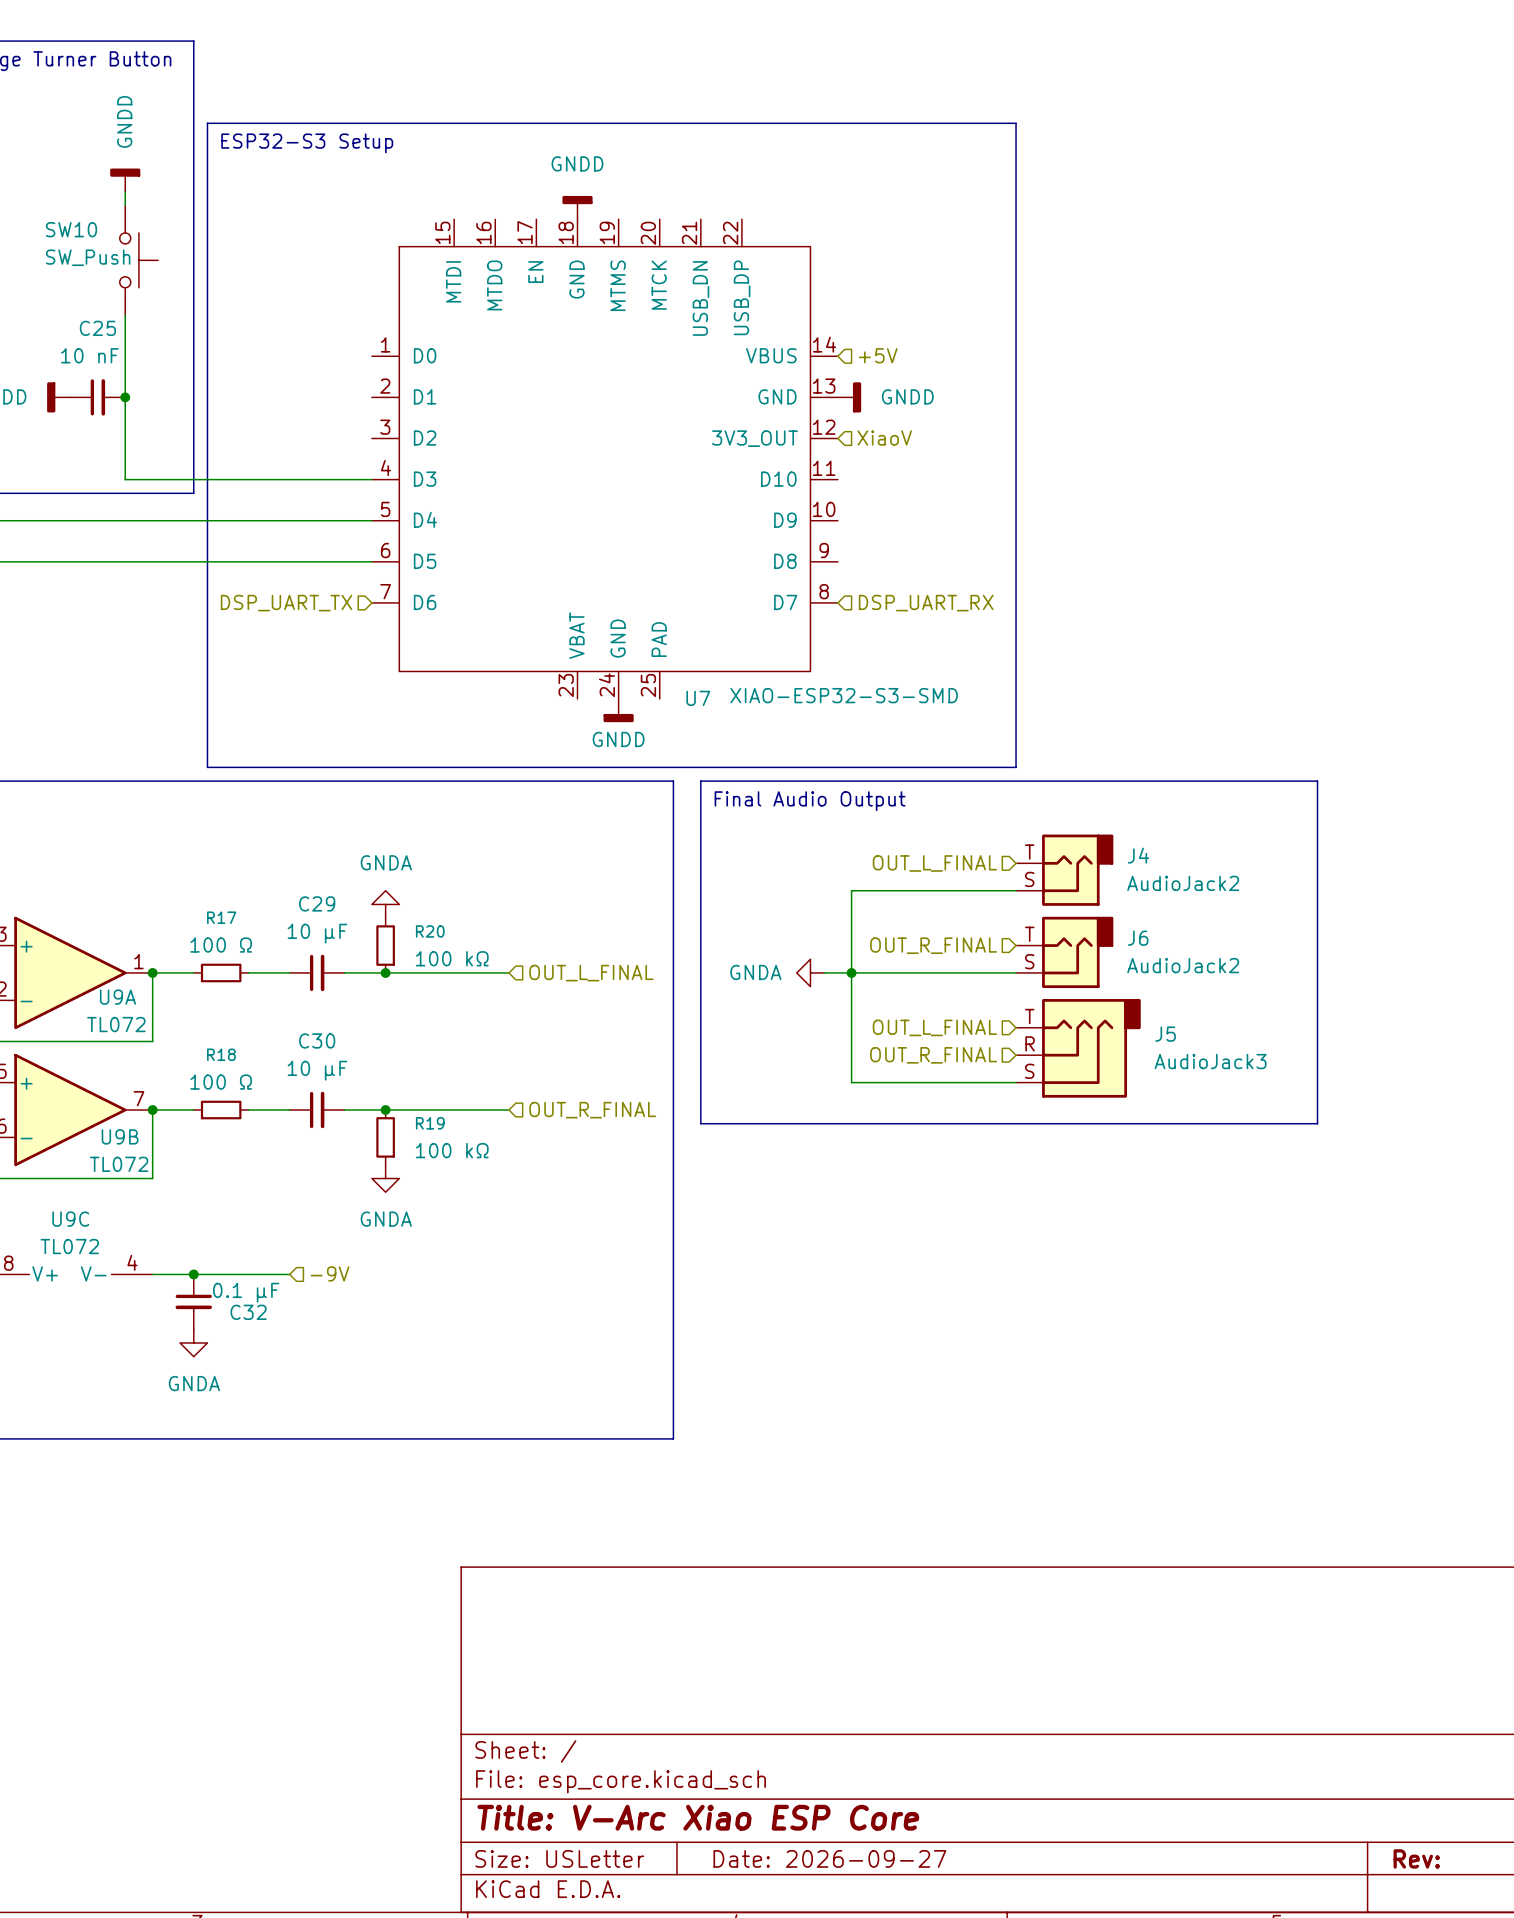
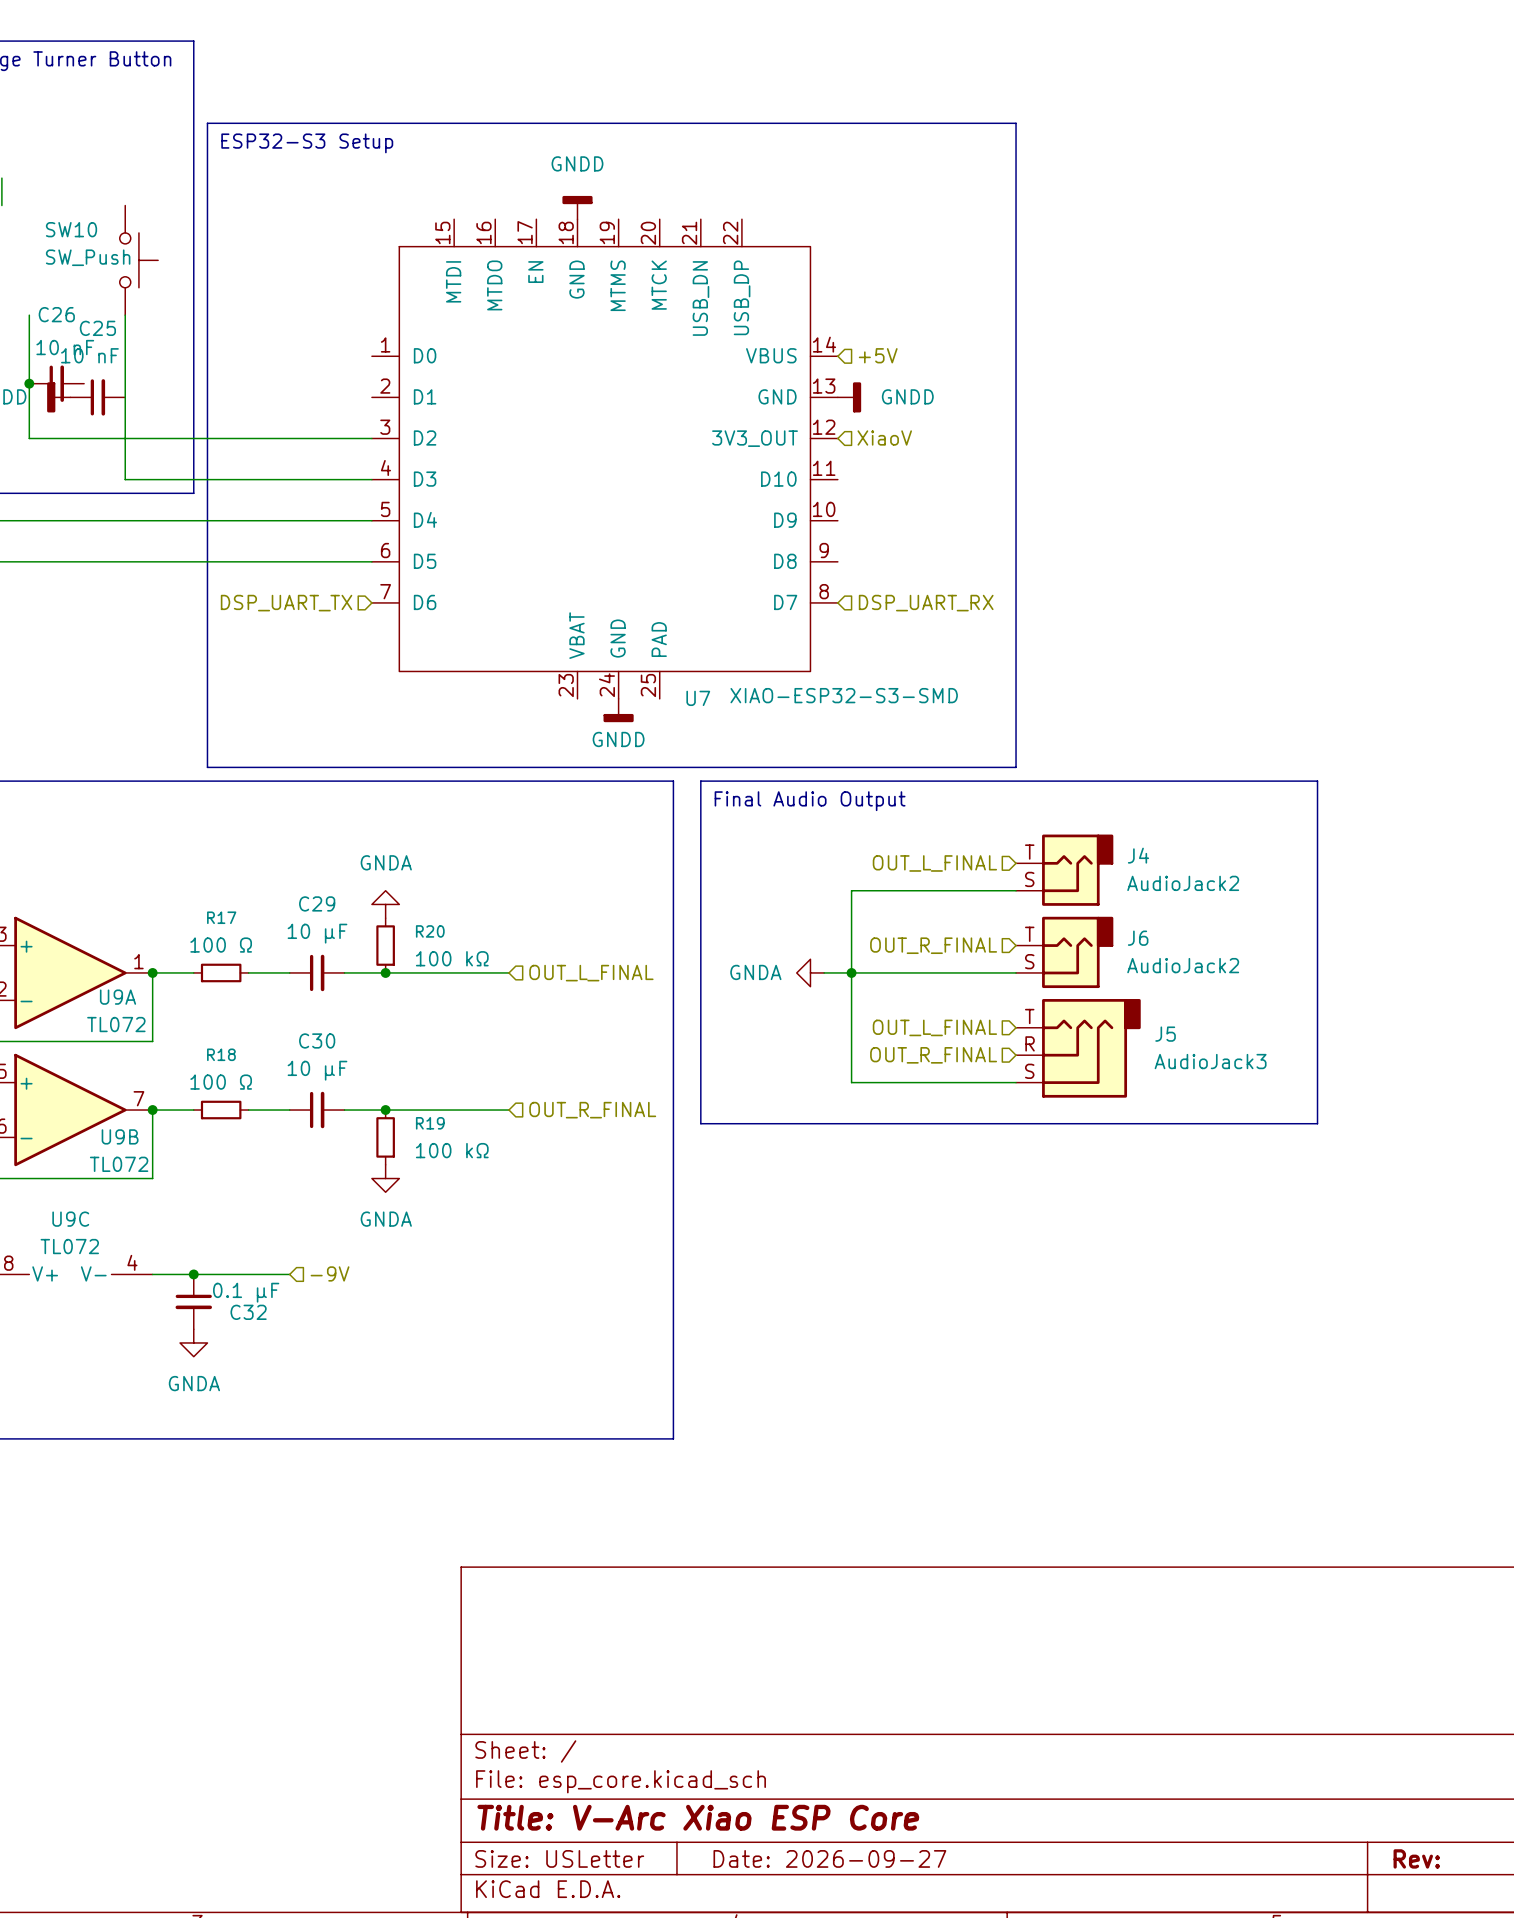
wire: none -> (1, 178) (1, 205)
power symbol: GNDD (125, 180) -> none
wire: (125, 191) (125, 205) -> none
wire: none -> (29, 315) (29, 438) (371, 438)
junction: none -> (29, 383)
C26: none -> 10 nF (56, 383)
junction: (125, 397) -> none

